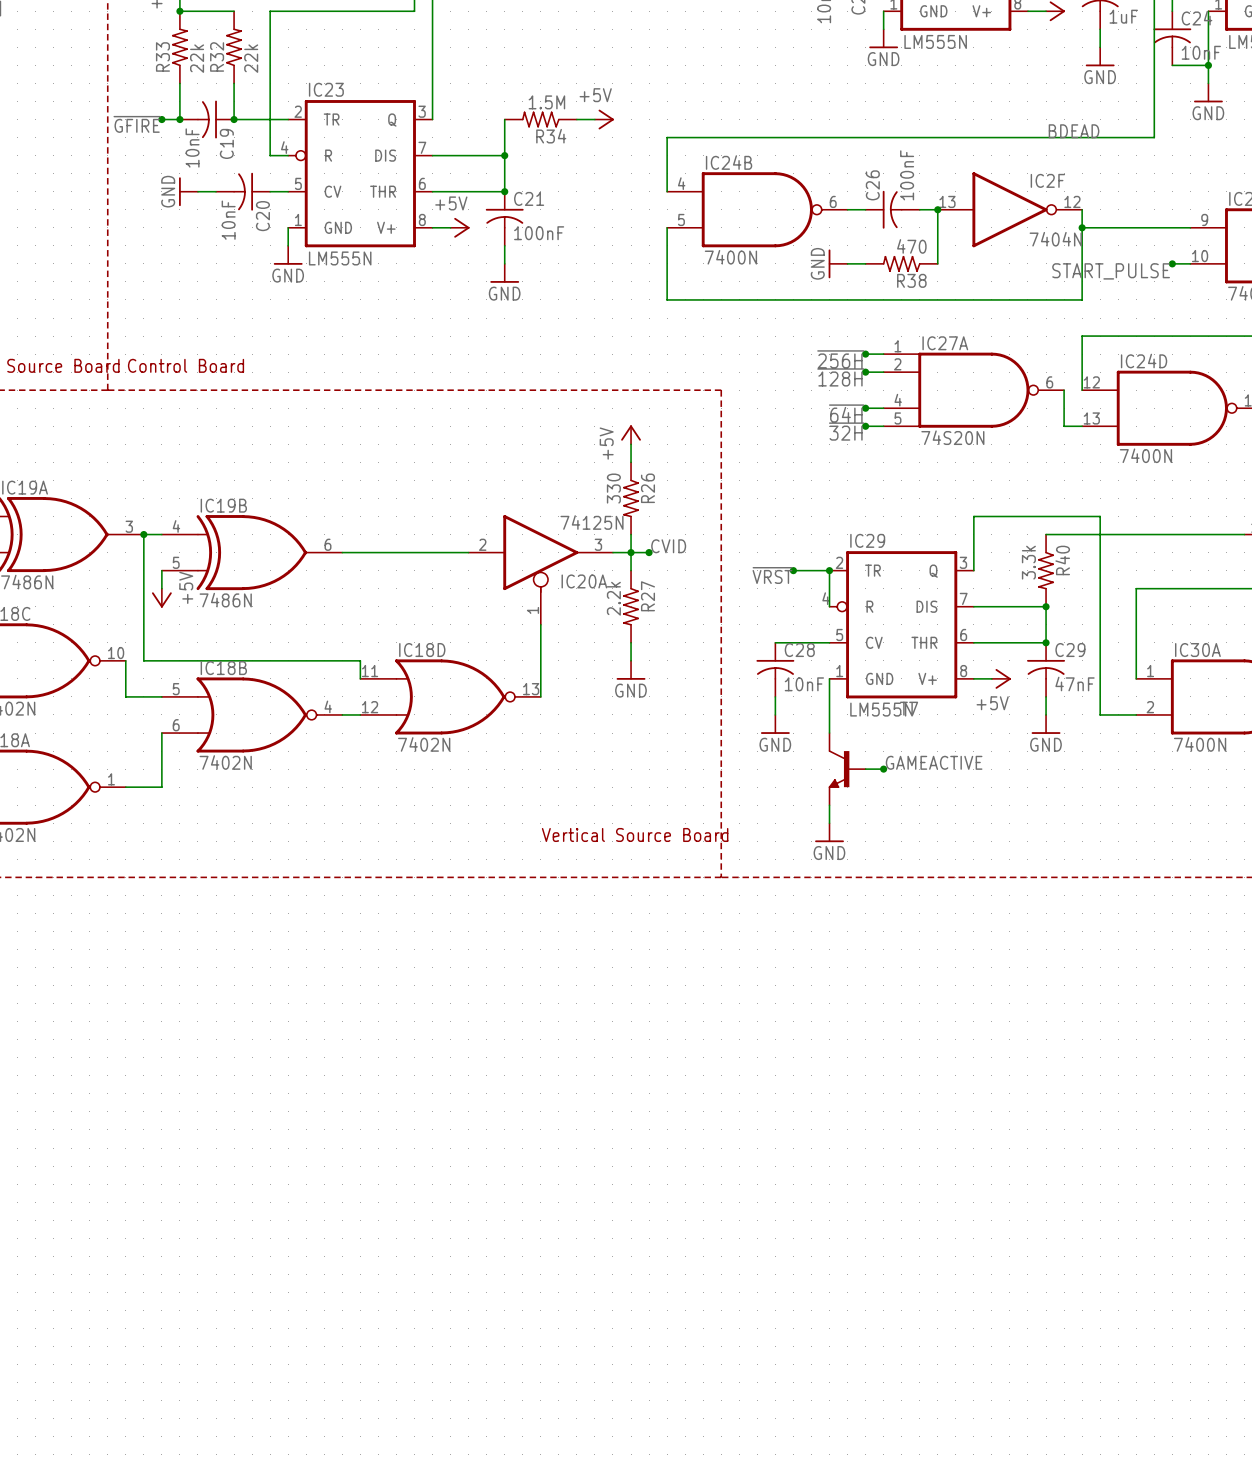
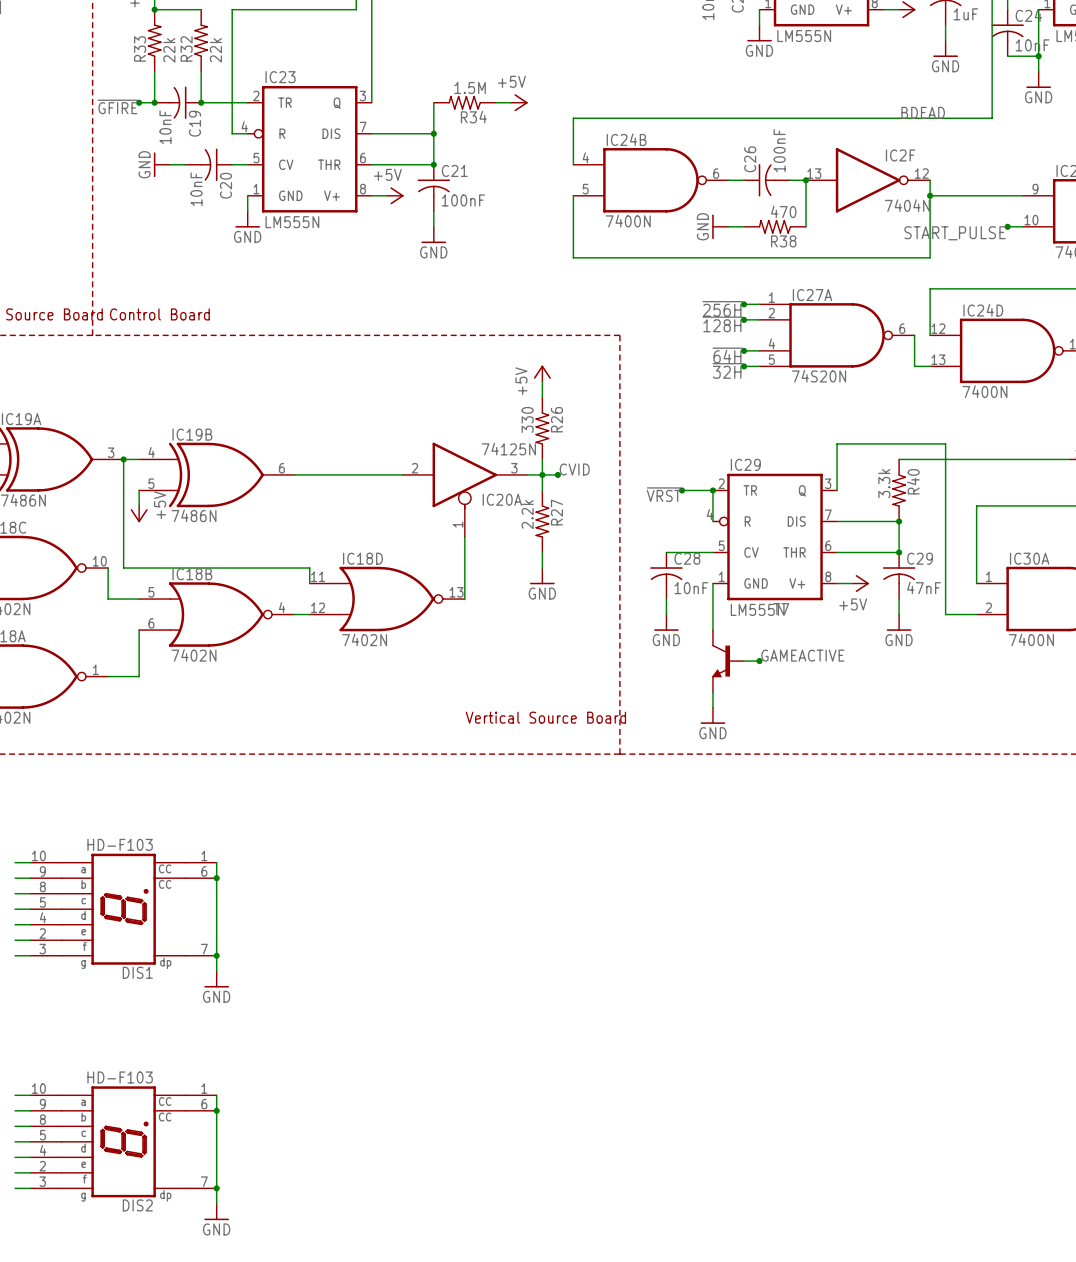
wire: none -> (15, 862) (30, 862)
wire: none -> (216, 862) (216, 971)
wire: none -> (15, 878) (30, 878)
junction: none -> (216, 878)
wire: none -> (15, 893) (30, 893)
wire: none -> (15, 909) (30, 909)
DIS1: none -> HD-F103 (123, 909)
wire: none -> (15, 924) (30, 924)
wire: none -> (15, 940) (30, 940)
wire: none -> (15, 955) (30, 955)
junction: none -> (216, 955)
power symbol: none -> GND (216, 979)
wire: none -> (15, 1095) (30, 1095)
wire: none -> (216, 1095) (216, 1203)
wire: none -> (15, 1110) (30, 1110)
junction: none -> (216, 1110)
wire: none -> (15, 1126) (30, 1126)
wire: none -> (15, 1141) (30, 1141)
DIS2: none -> HD-F103 (123, 1141)
wire: none -> (15, 1157) (30, 1157)
wire: none -> (15, 1172) (30, 1172)
wire: none -> (15, 1188) (30, 1188)
junction: none -> (216, 1188)
power symbol: none -> GND (216, 1212)

